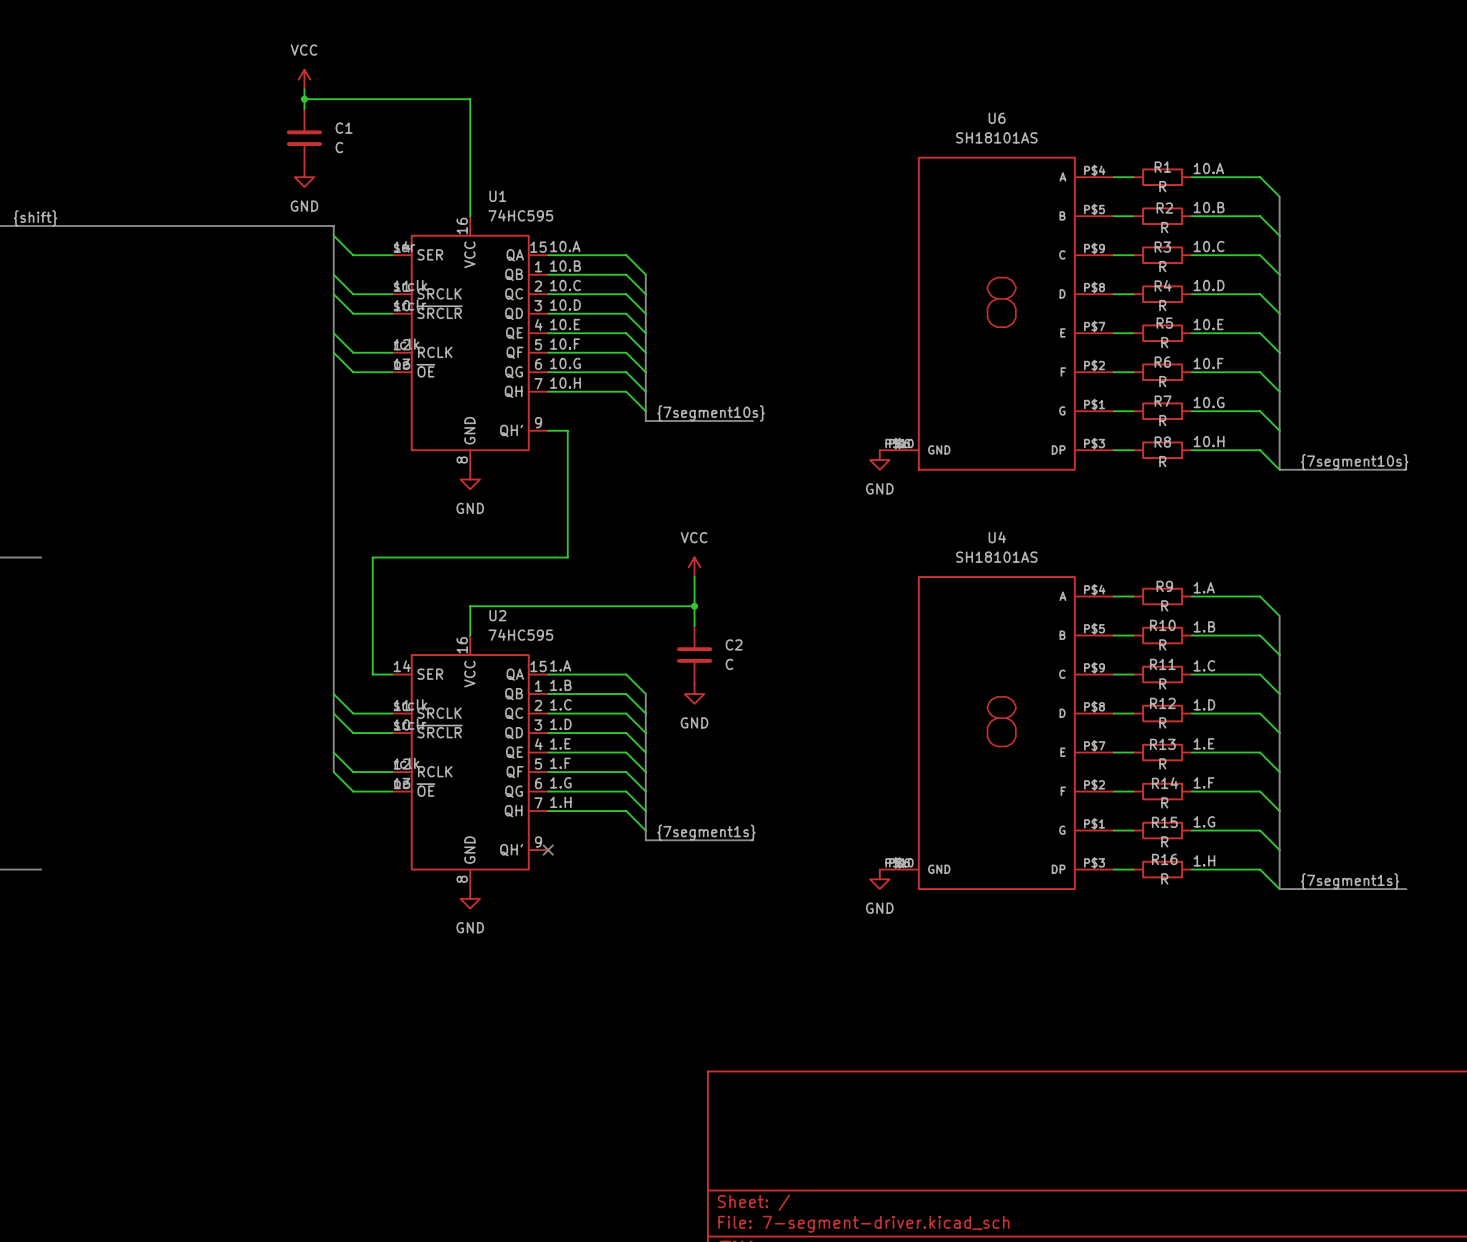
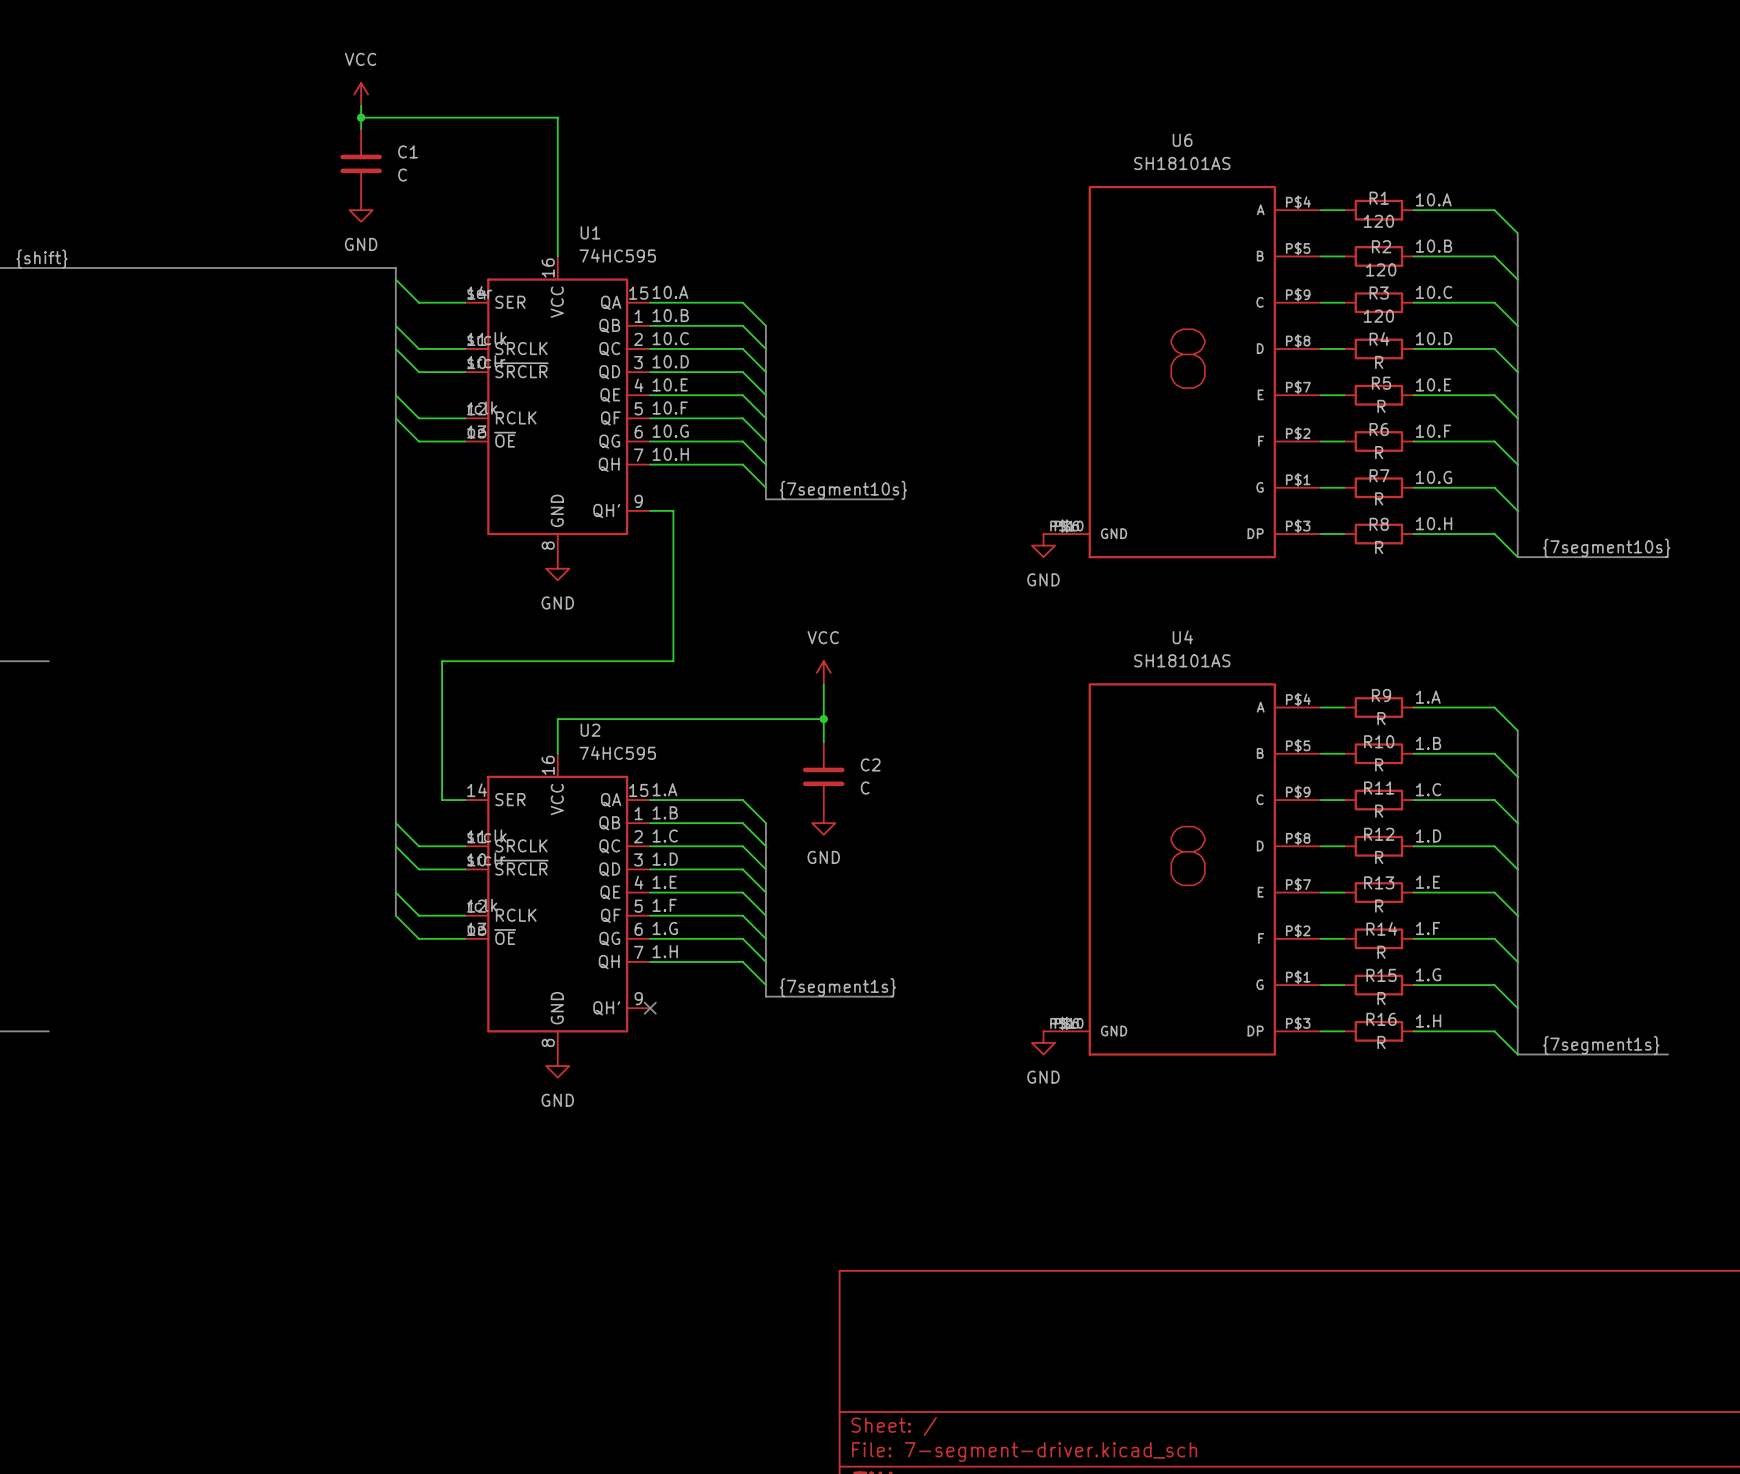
R1 value: R (1162, 186) -> 120 (1378, 221)
R2 value: R (1164, 227) -> 120 (1381, 269)
R3 value: R (1162, 266) -> 120 (1378, 316)

